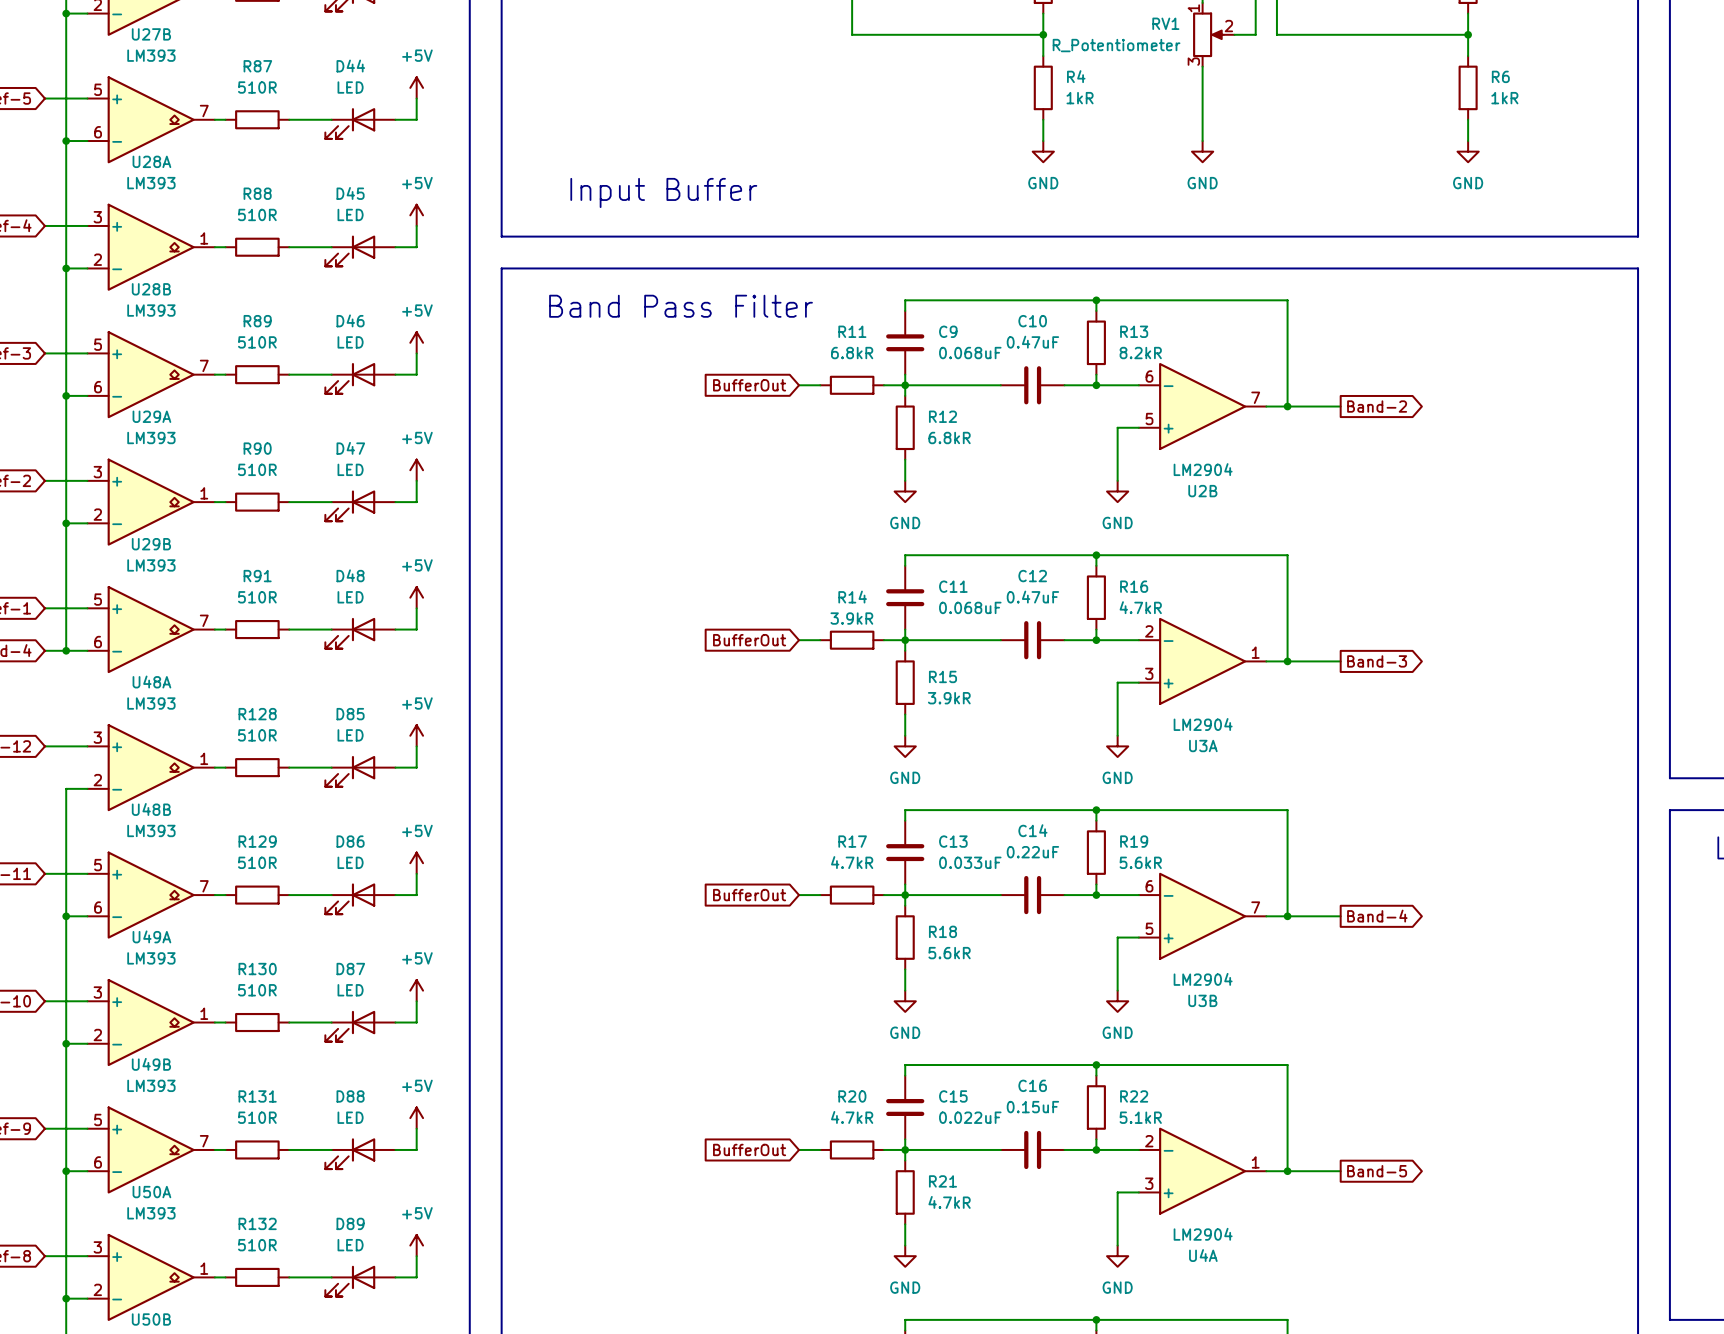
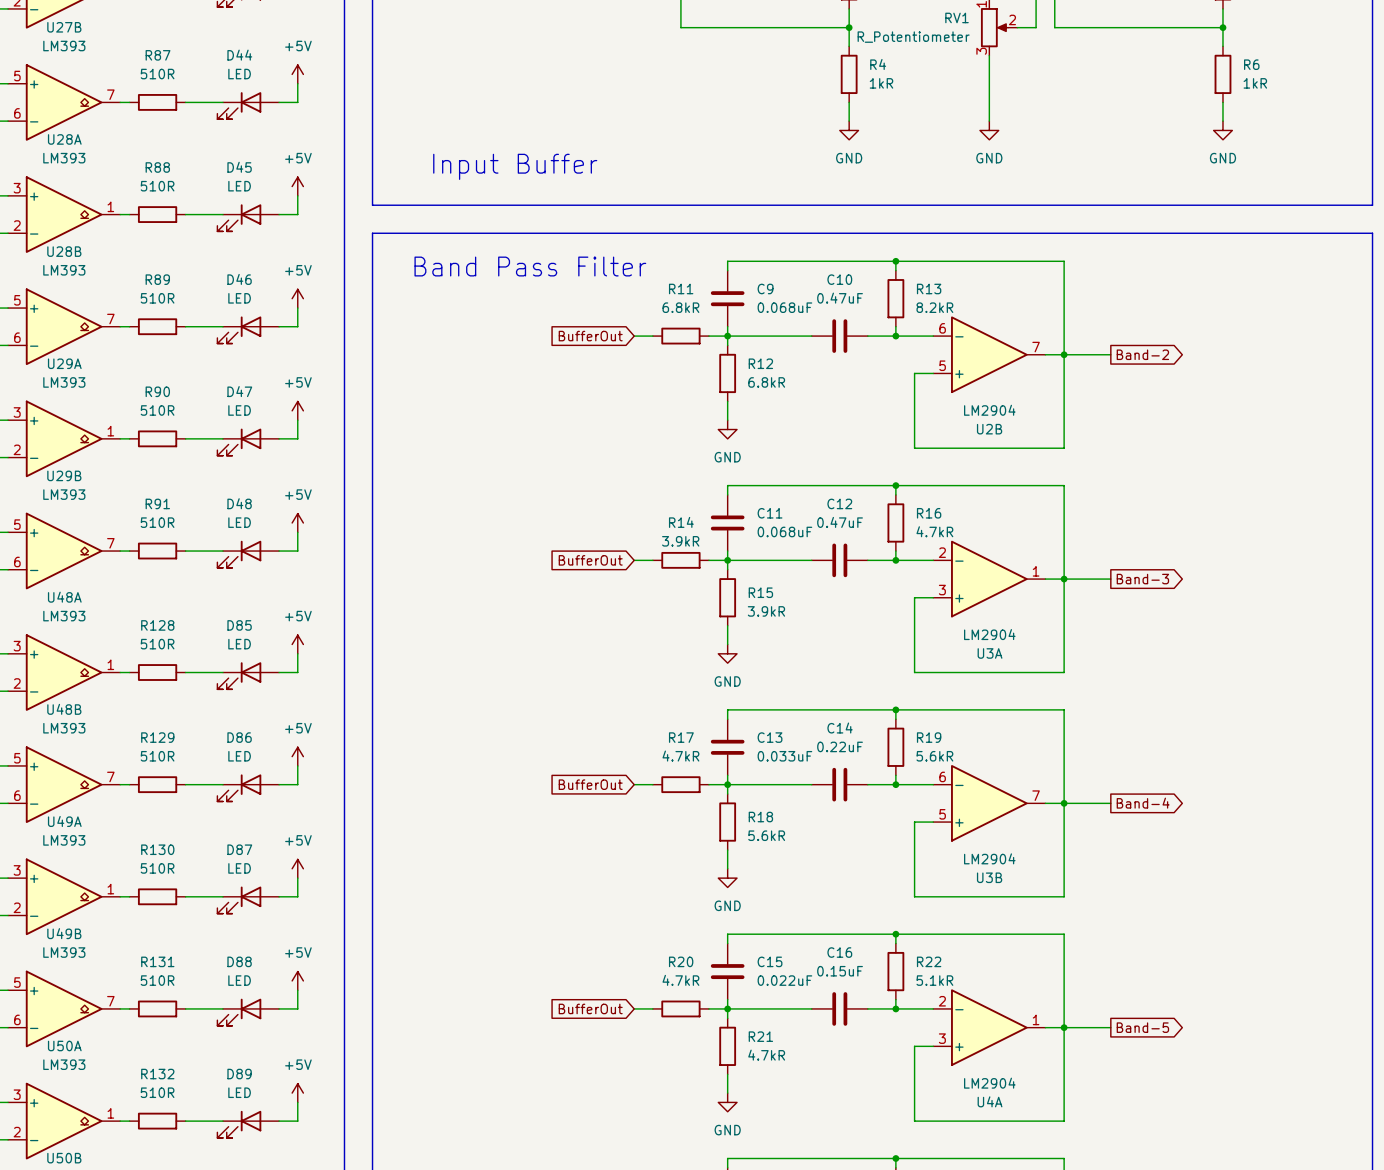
wire: none -> (1064, 354) (1064, 448) (914, 448) (914, 420)
power symbol: GND (1117, 491) -> none
wire: none -> (1064, 579) (1064, 672) (914, 672) (914, 644)
power symbol: GND (1117, 746) -> none
wire: none -> (1064, 803) (1064, 896) (914, 896) (914, 868)
power symbol: GND (1117, 1001) -> none
wire: none -> (1064, 1027) (1064, 1121) (914, 1121) (914, 1093)
power symbol: GND (1117, 1256) -> none

